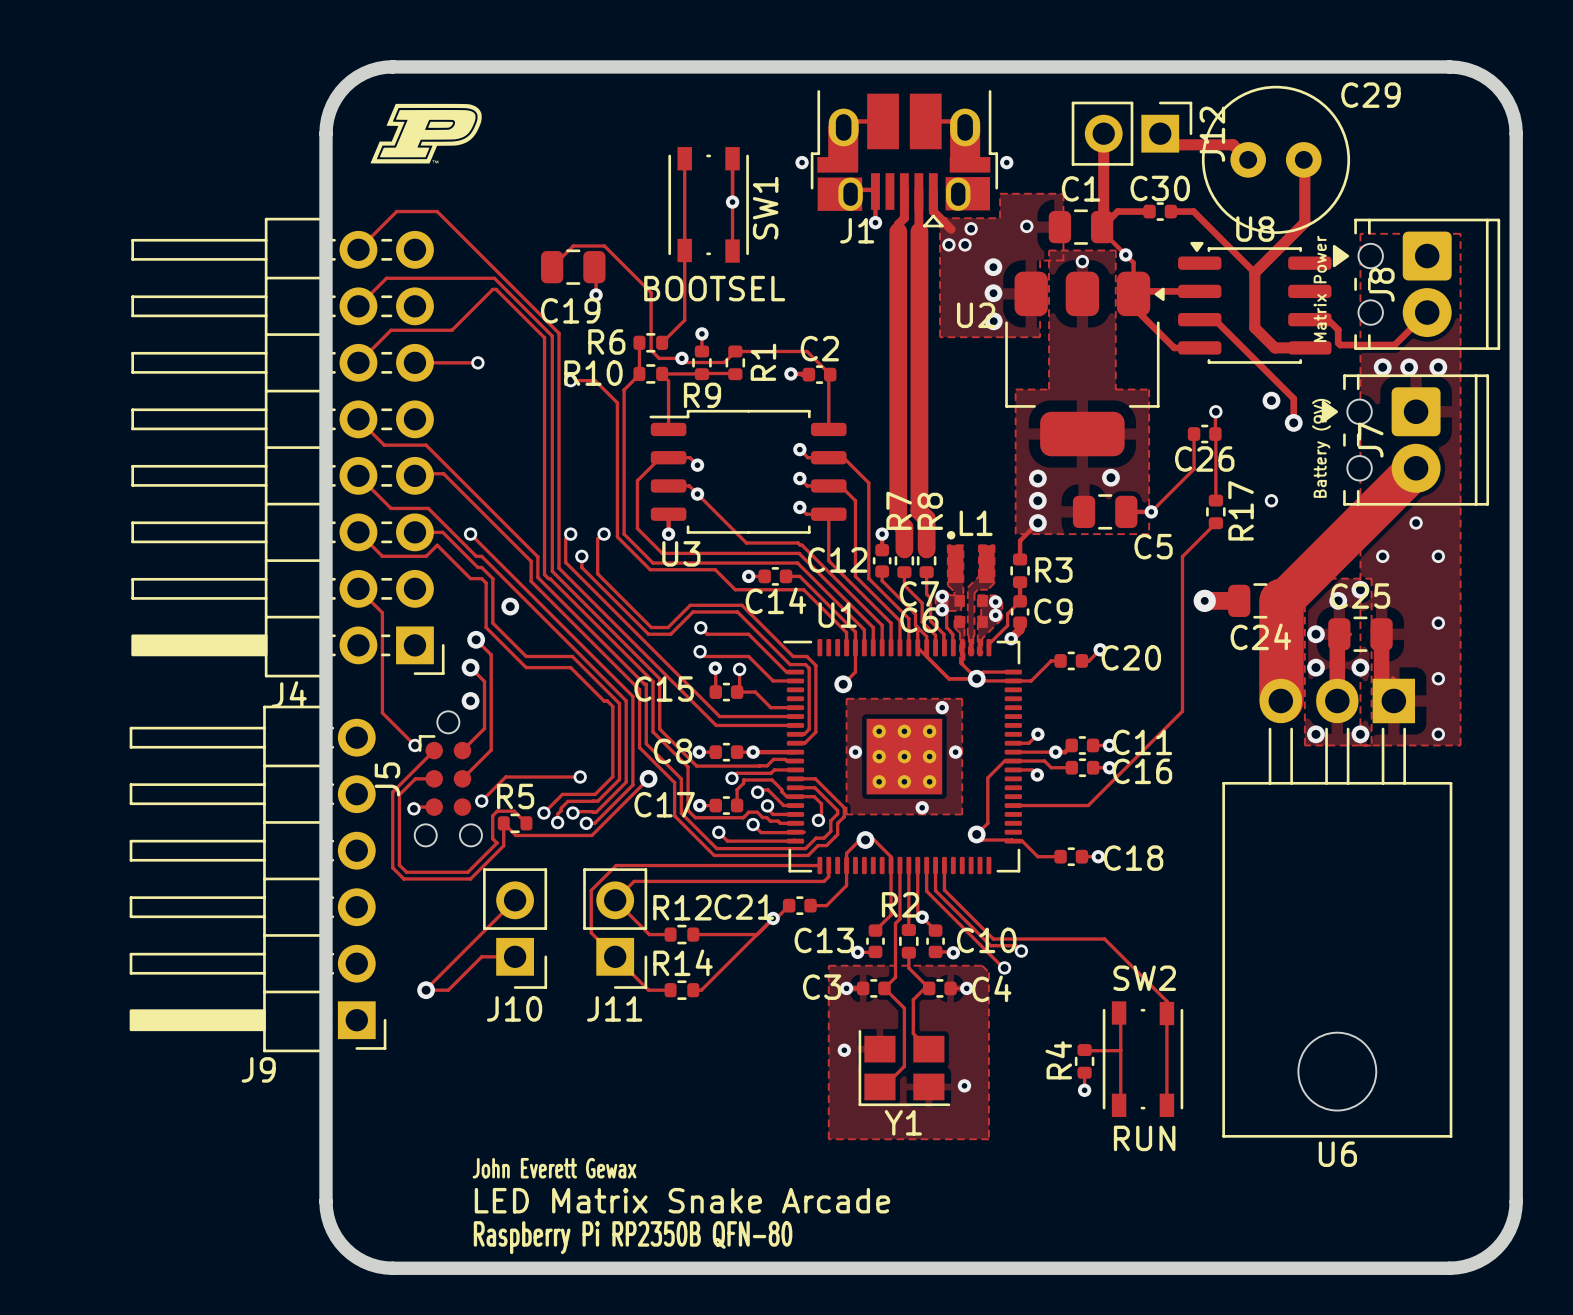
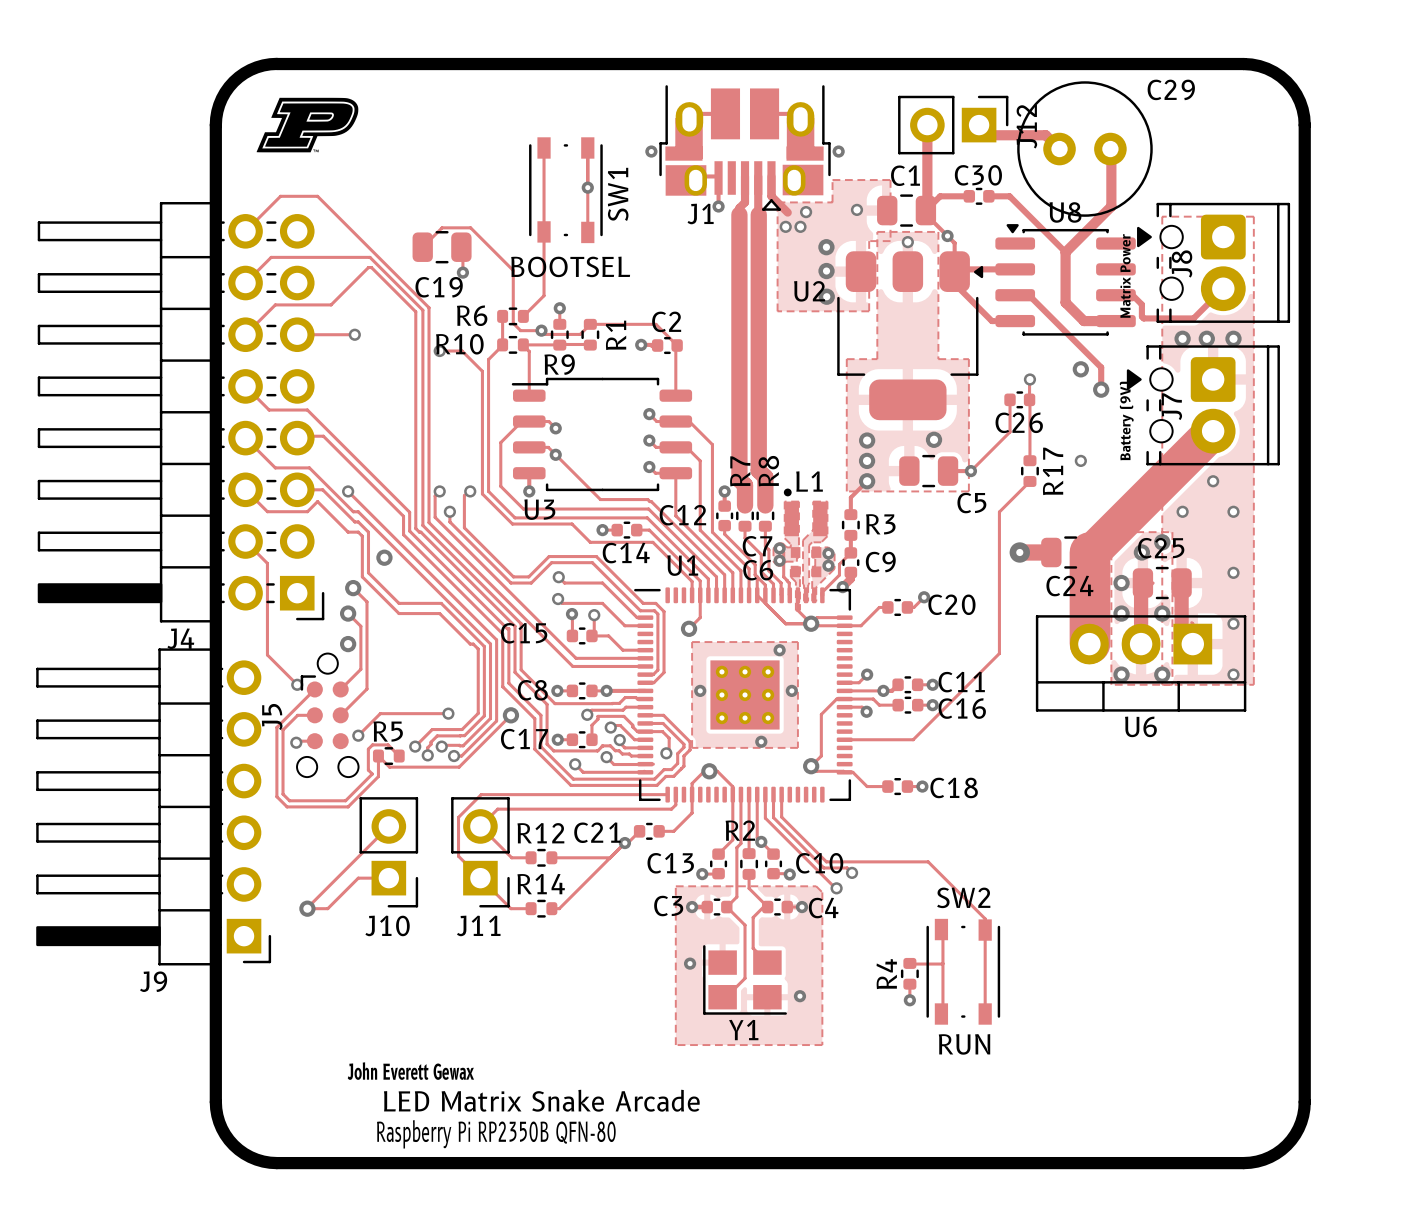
U6 footprint: [1222, 678, 1453, 1138] -> [1035, 615, 1247, 712]
U6 name position: U6 (1337, 1154) -> U6 (1140, 726)

